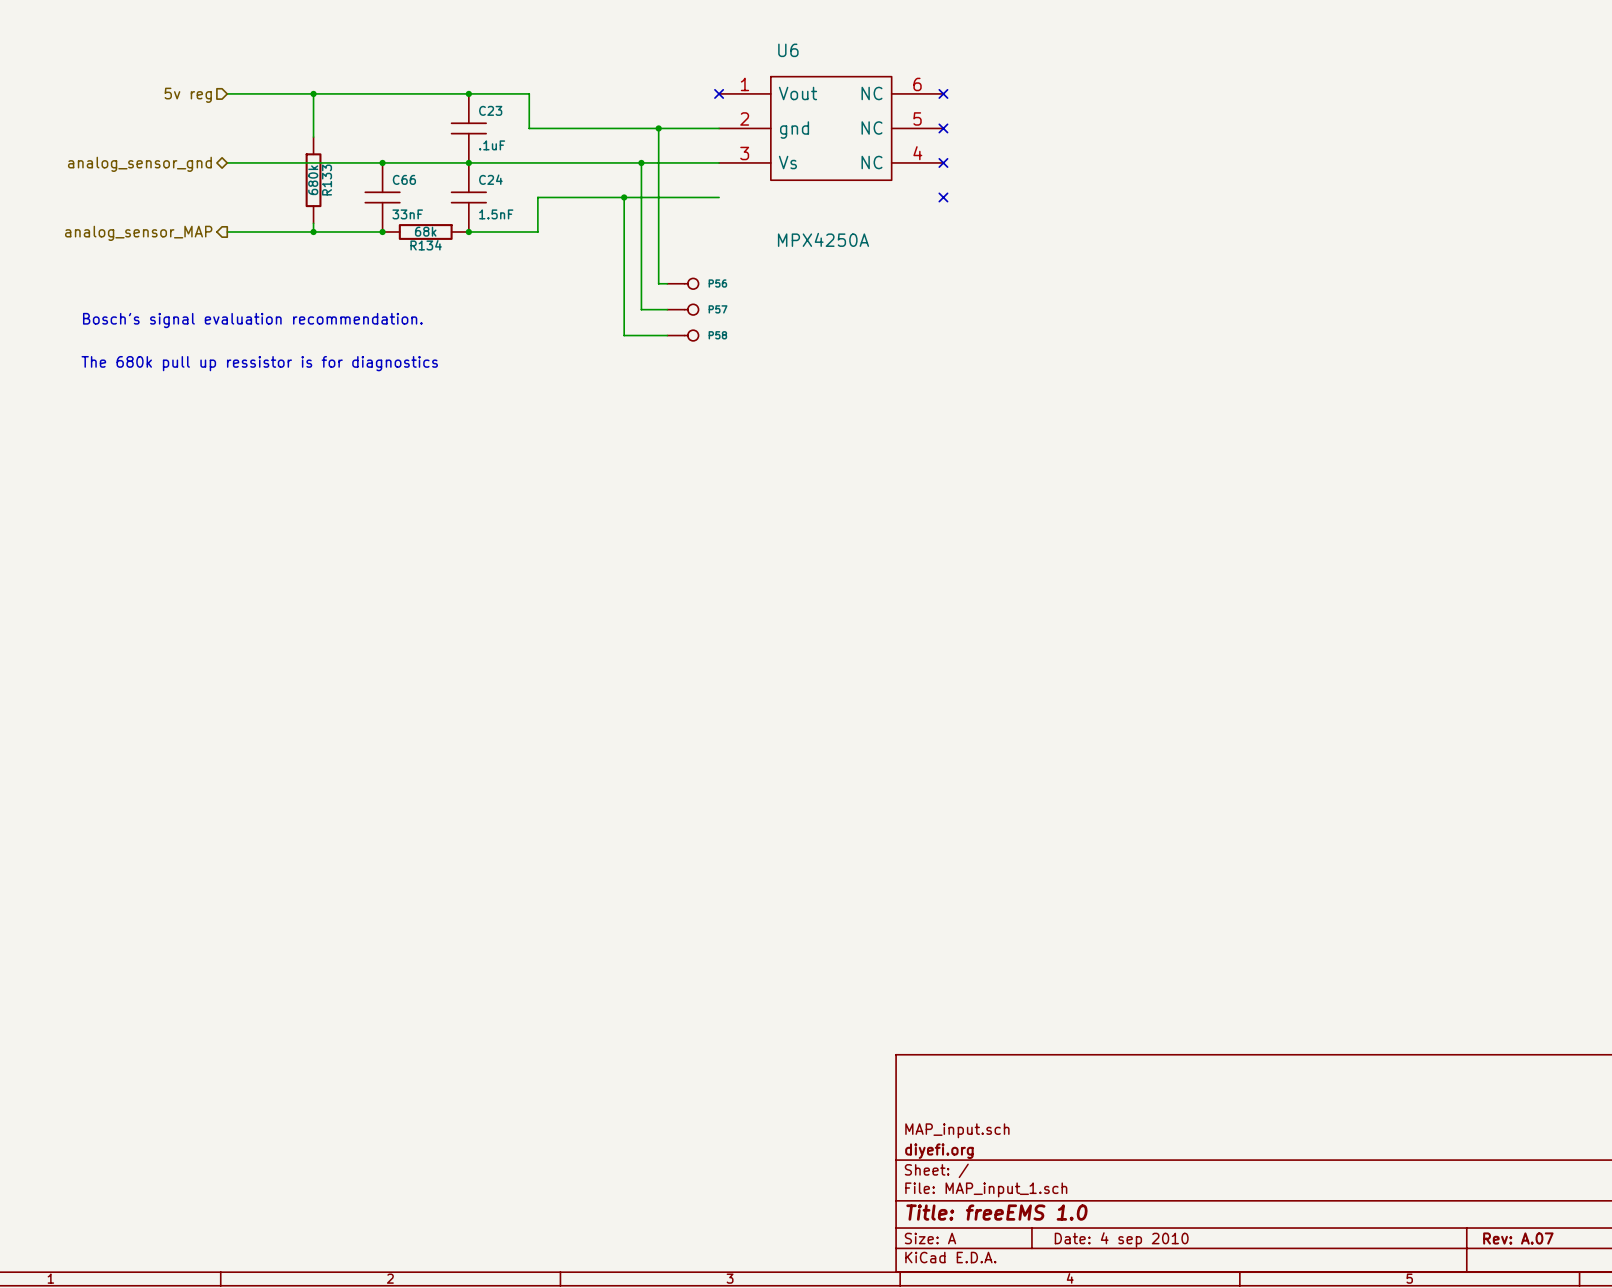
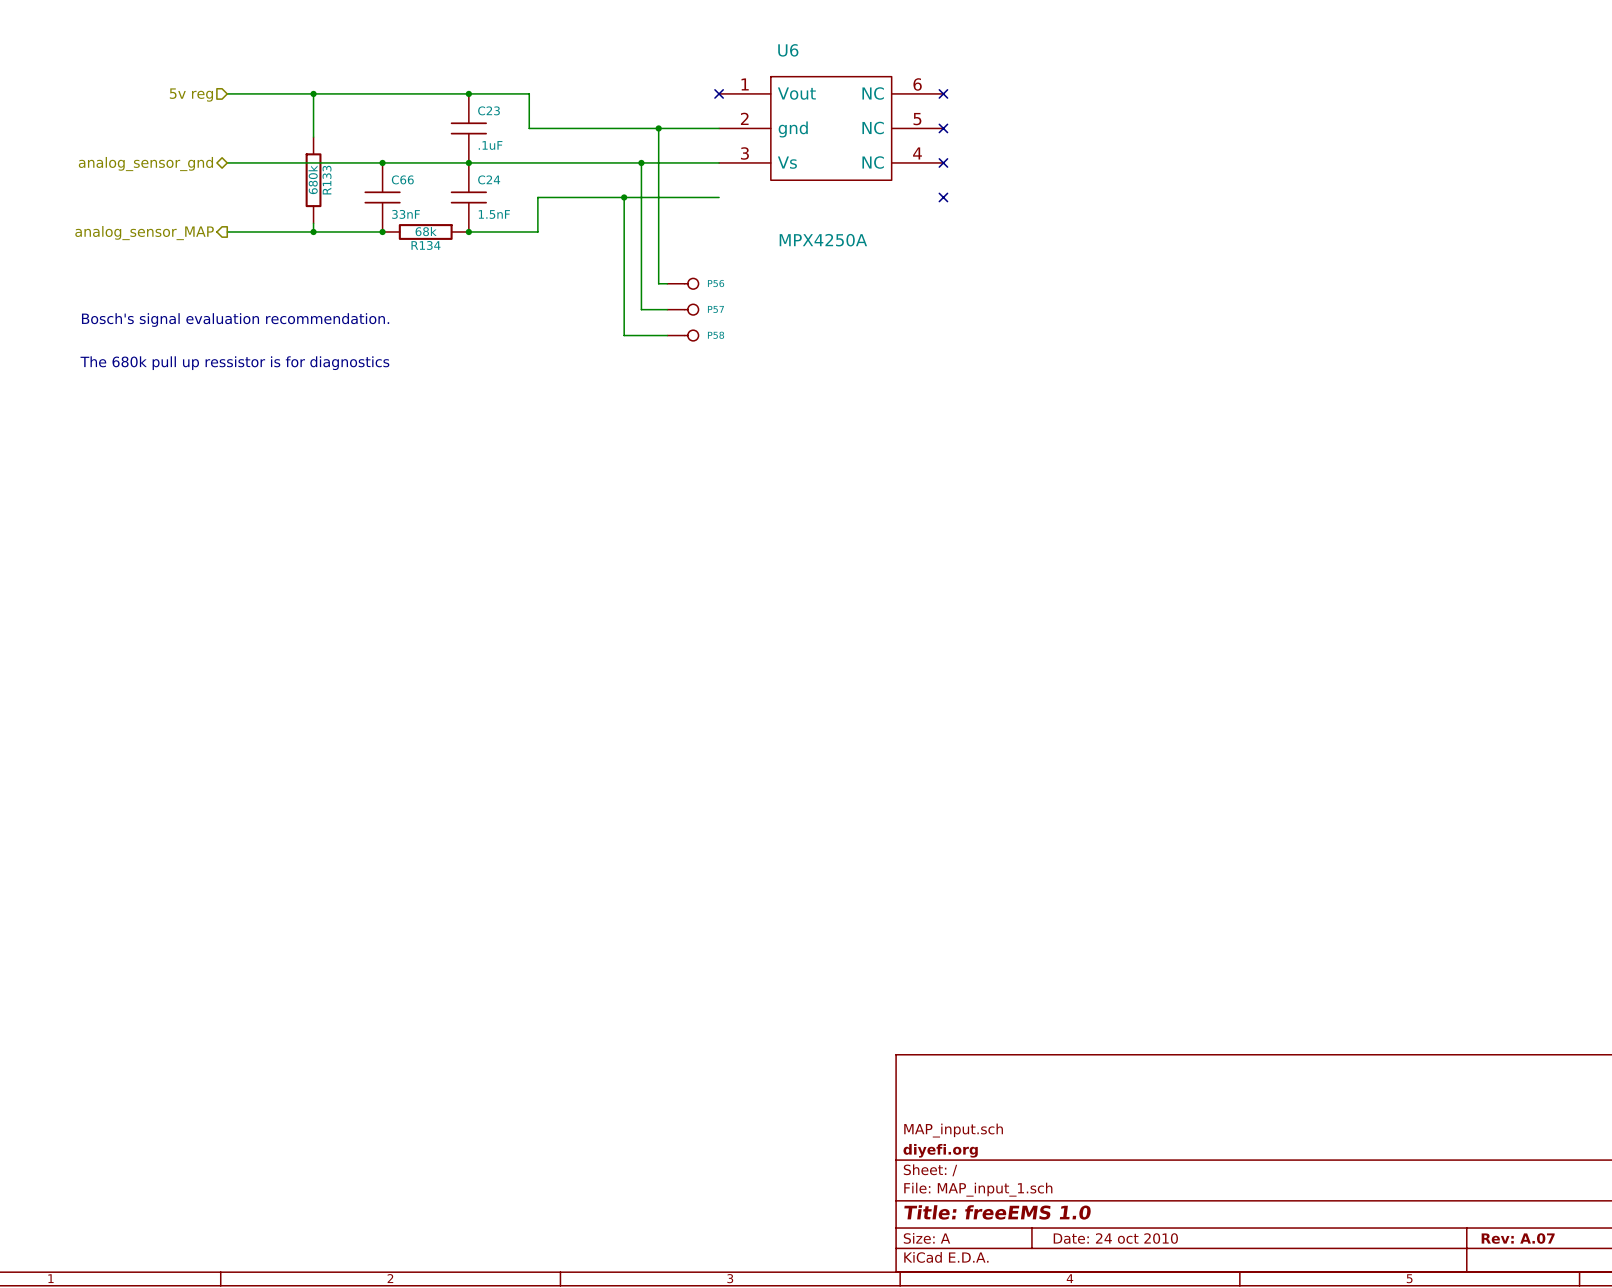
title block: Date: 4 sep 2010 (1121, 1239) -> Date: 24 oct 2010 (1115, 1238)

